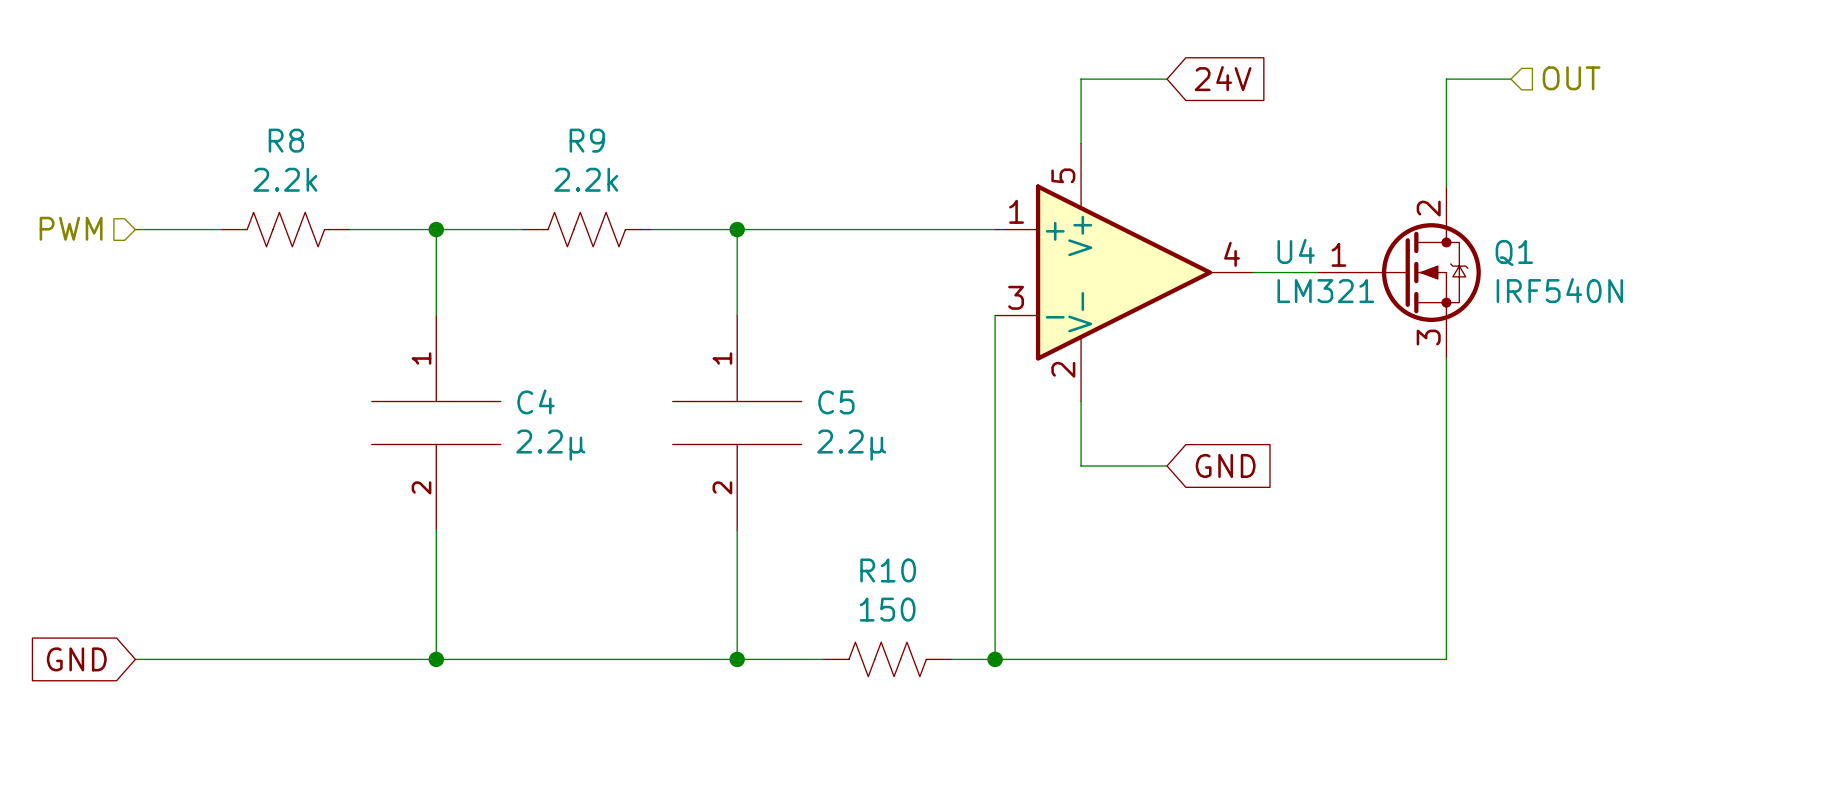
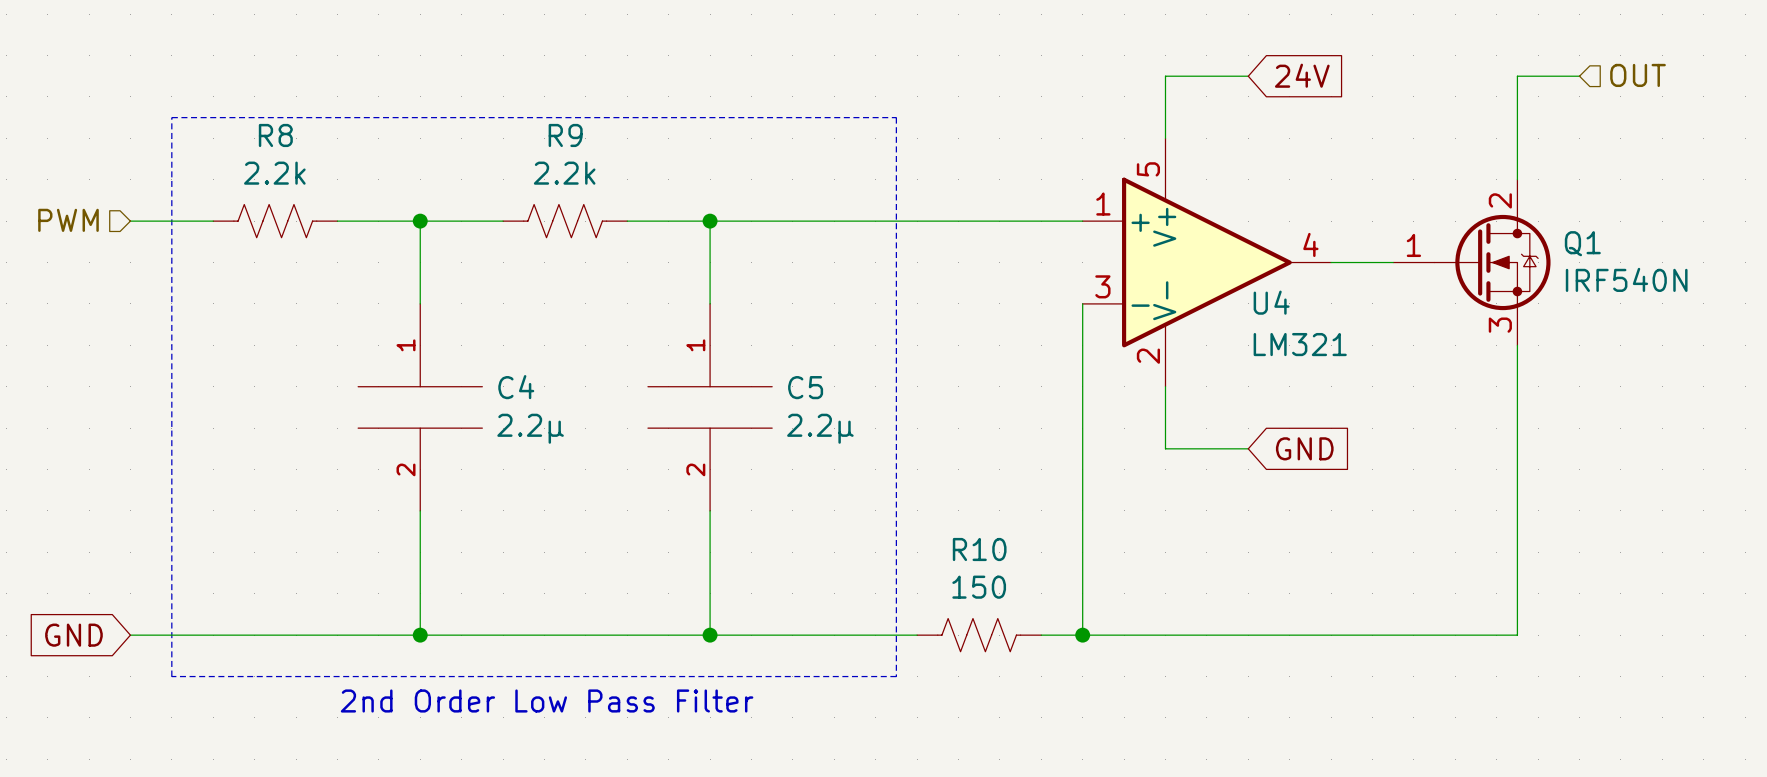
global label position: 24V (1223, 78) -> 24V (1302, 75)
hierarchical label position: OUT (1571, 78) -> OUT (1638, 75)
wire: (1167, 79) (1081, 79) (1081, 143) -> (1248, 76) (1165, 76) (1165, 138)
wire: (1510, 79) (1446, 79) (1446, 186) -> (1579, 76) (1517, 76) (1517, 179)
line: none -> (171, 117) (171, 676) (896, 676) (896, 117) (171, 117)
U4 name position: U4 (1296, 251) -> U4 (1271, 302)
U4 position: (1124, 272) -> (1206, 262)
Q1 position: (1399, 272) -> (1471, 262)
U4 value position: LM321 (1325, 291) -> LM321 (1300, 344)
wire: (995, 315) (995, 659) -> (1082, 303) (1082, 635)
wire: (1446, 358) (1446, 659) -> (1517, 345) (1517, 635) (1393, 635)
wire: (1081, 401) (1081, 465) (1167, 465) -> (1165, 386) (1165, 448) (1248, 448)
global label position: GND (1225, 465) -> GND (1304, 448)
R10 position: (887, 659) -> (979, 635)
wire: (952, 659) (1081, 659) -> (917, 635) (792, 635)
junction: (995, 659) -> none
junction: none -> (1082, 635)
text: none -> 2nd Order Low Pass Filter (547, 700)

